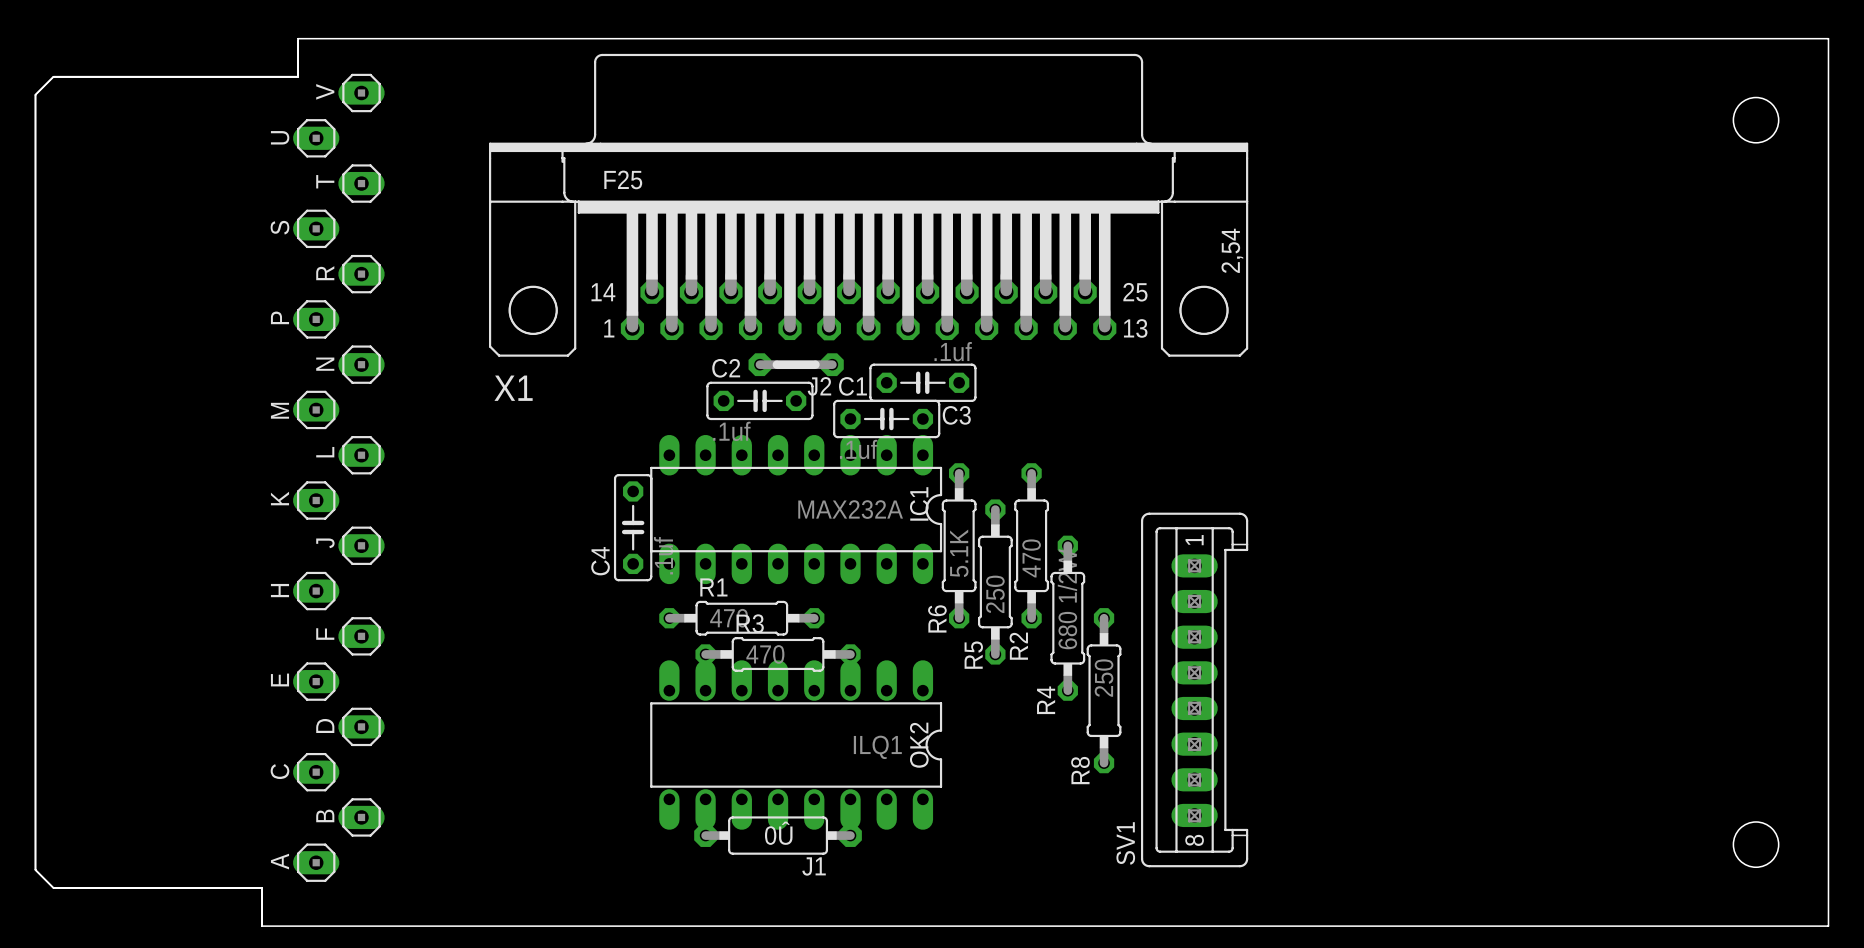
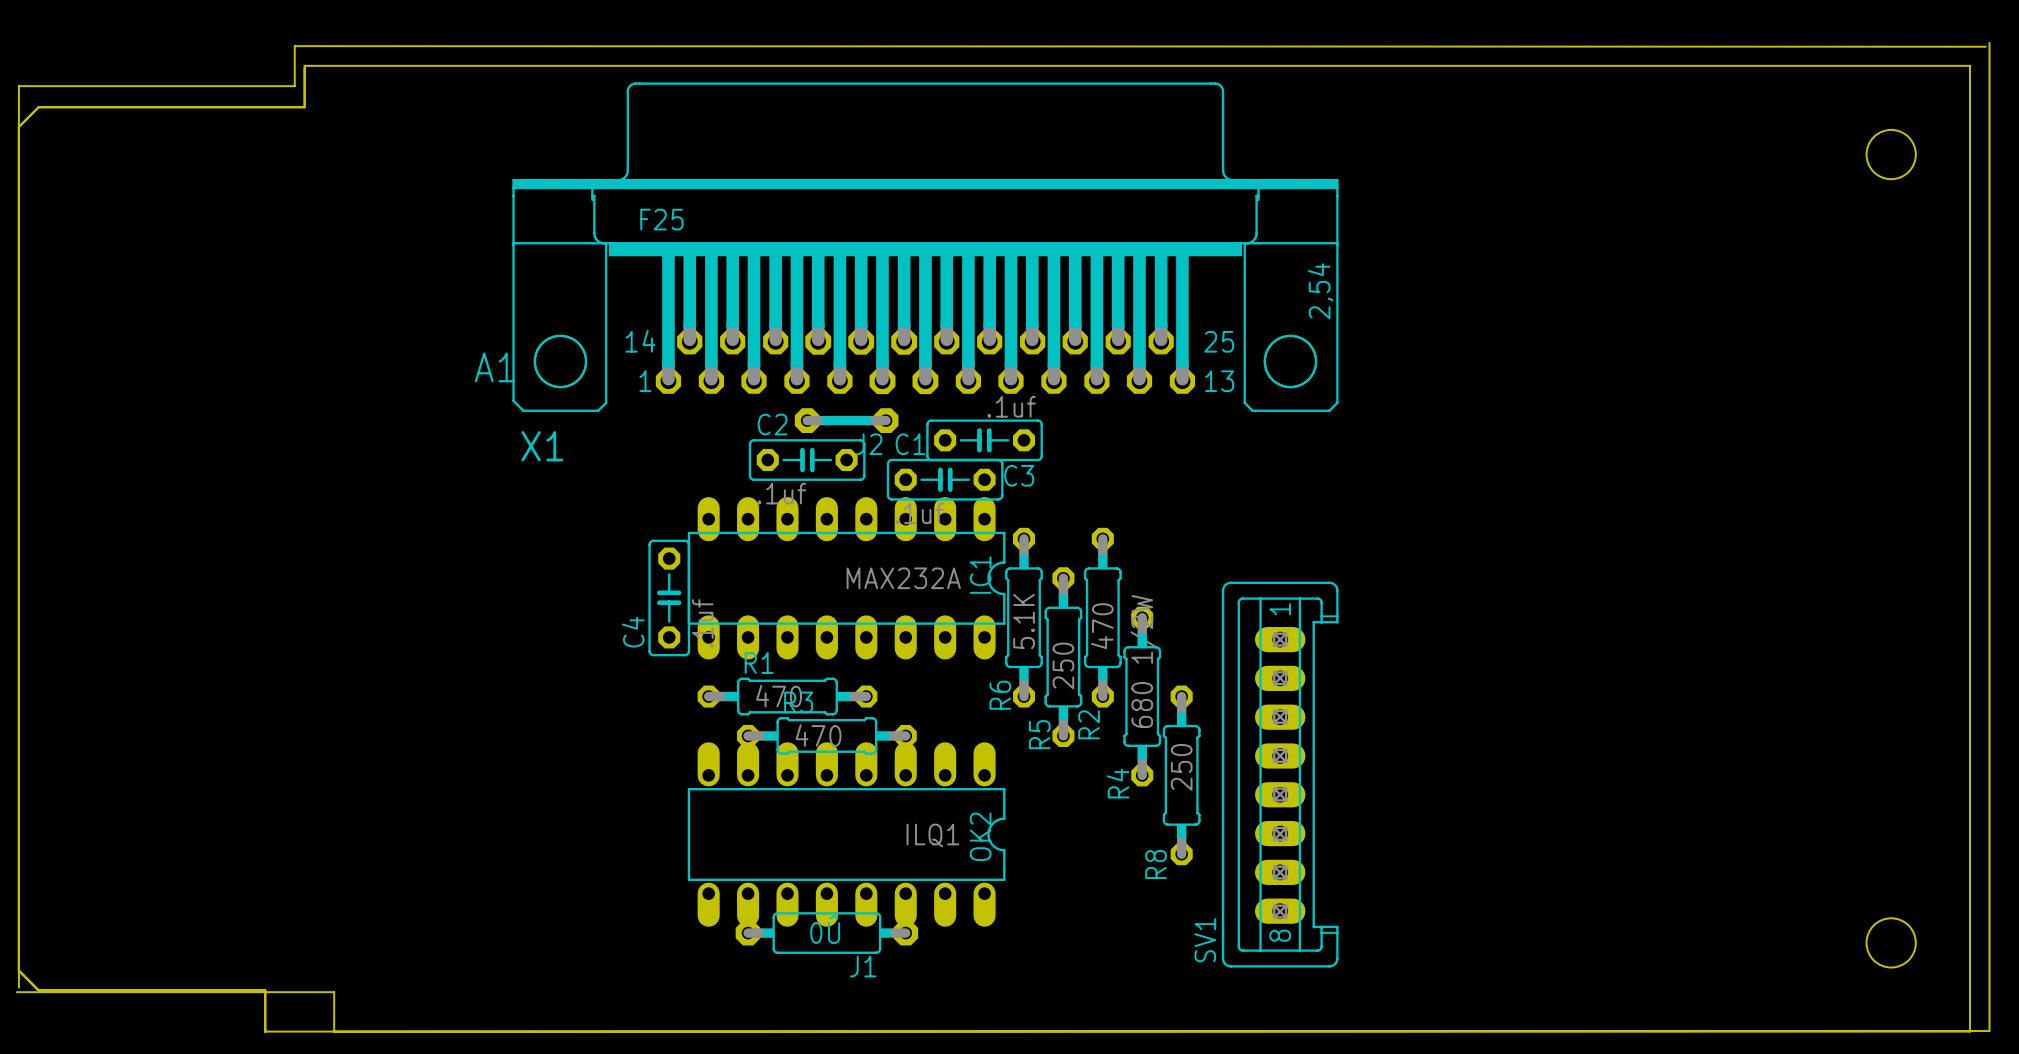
board edge: none -> (1989, 42) (1989, 1031) (334, 1031) (334, 992) (16, 992)
board edge: none -> (1985, 46) (294, 46) (294, 86) (18, 86) (18, 987)
text: none -> A1 (494, 367)
part: (338, 477) -> none

